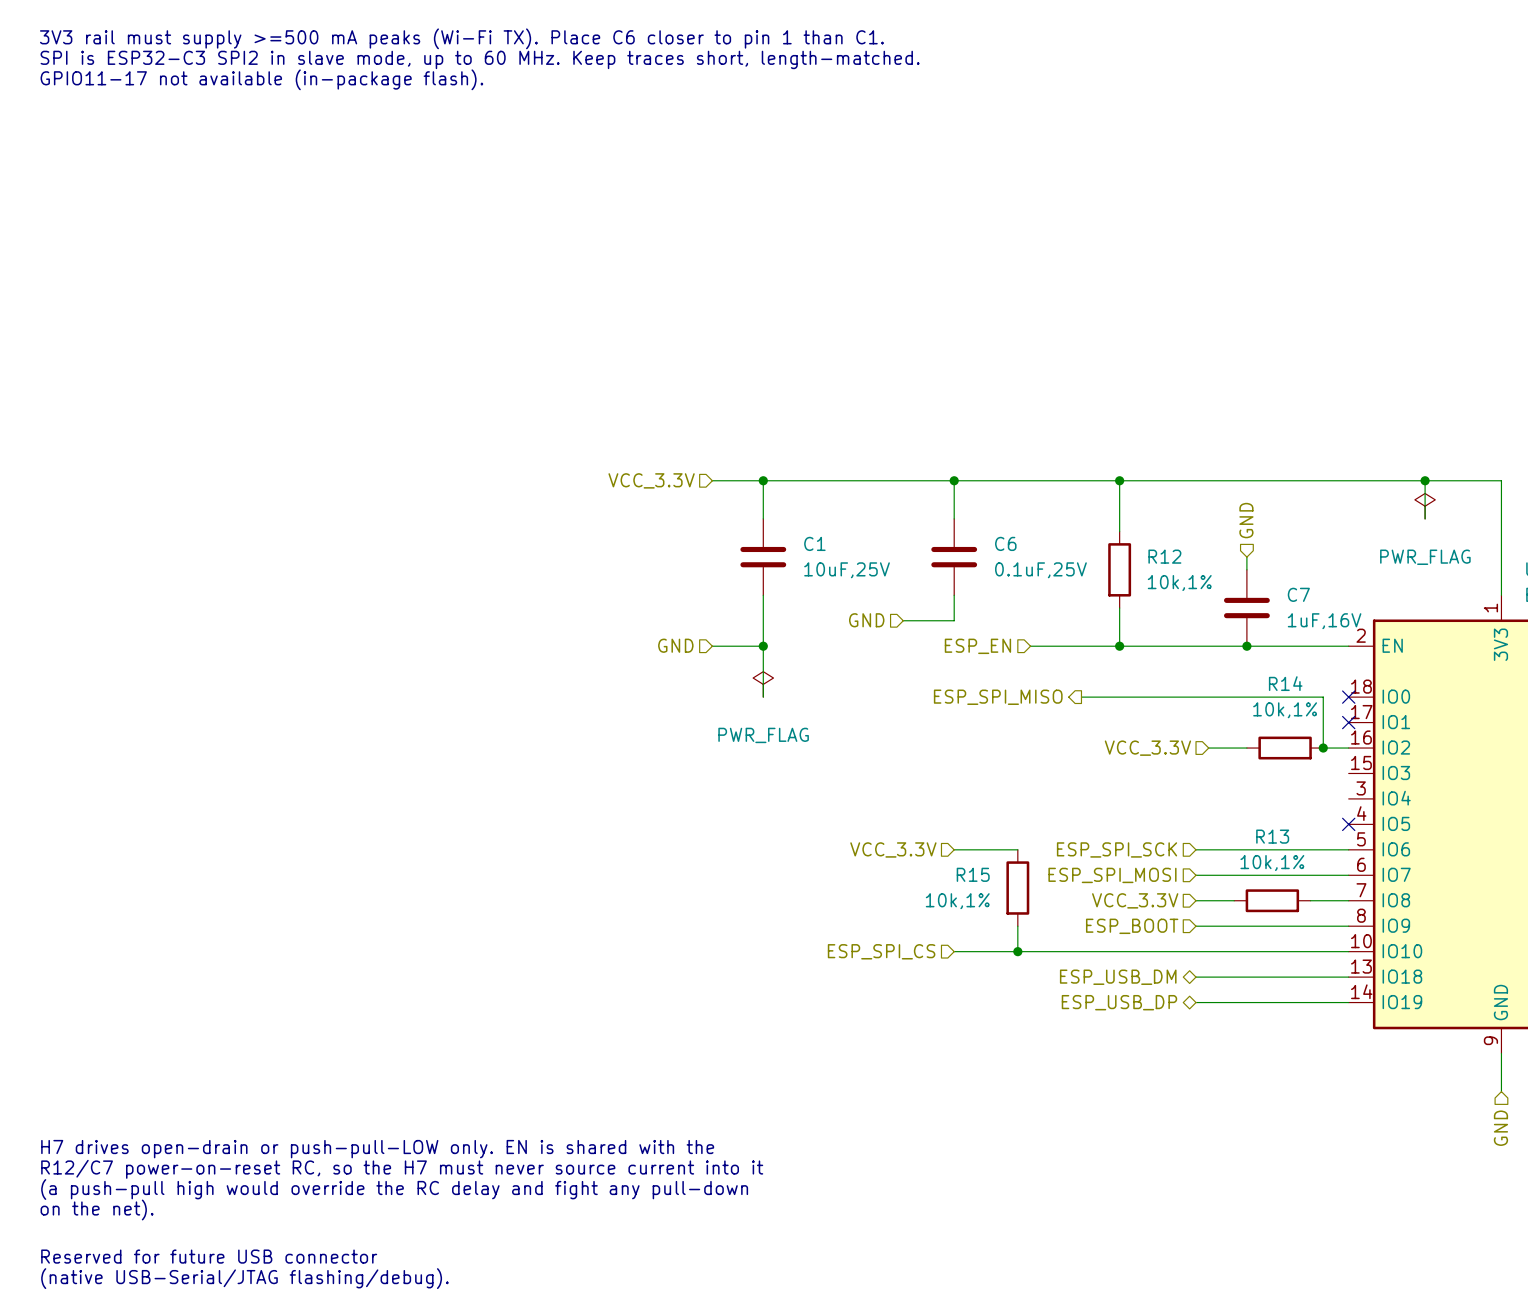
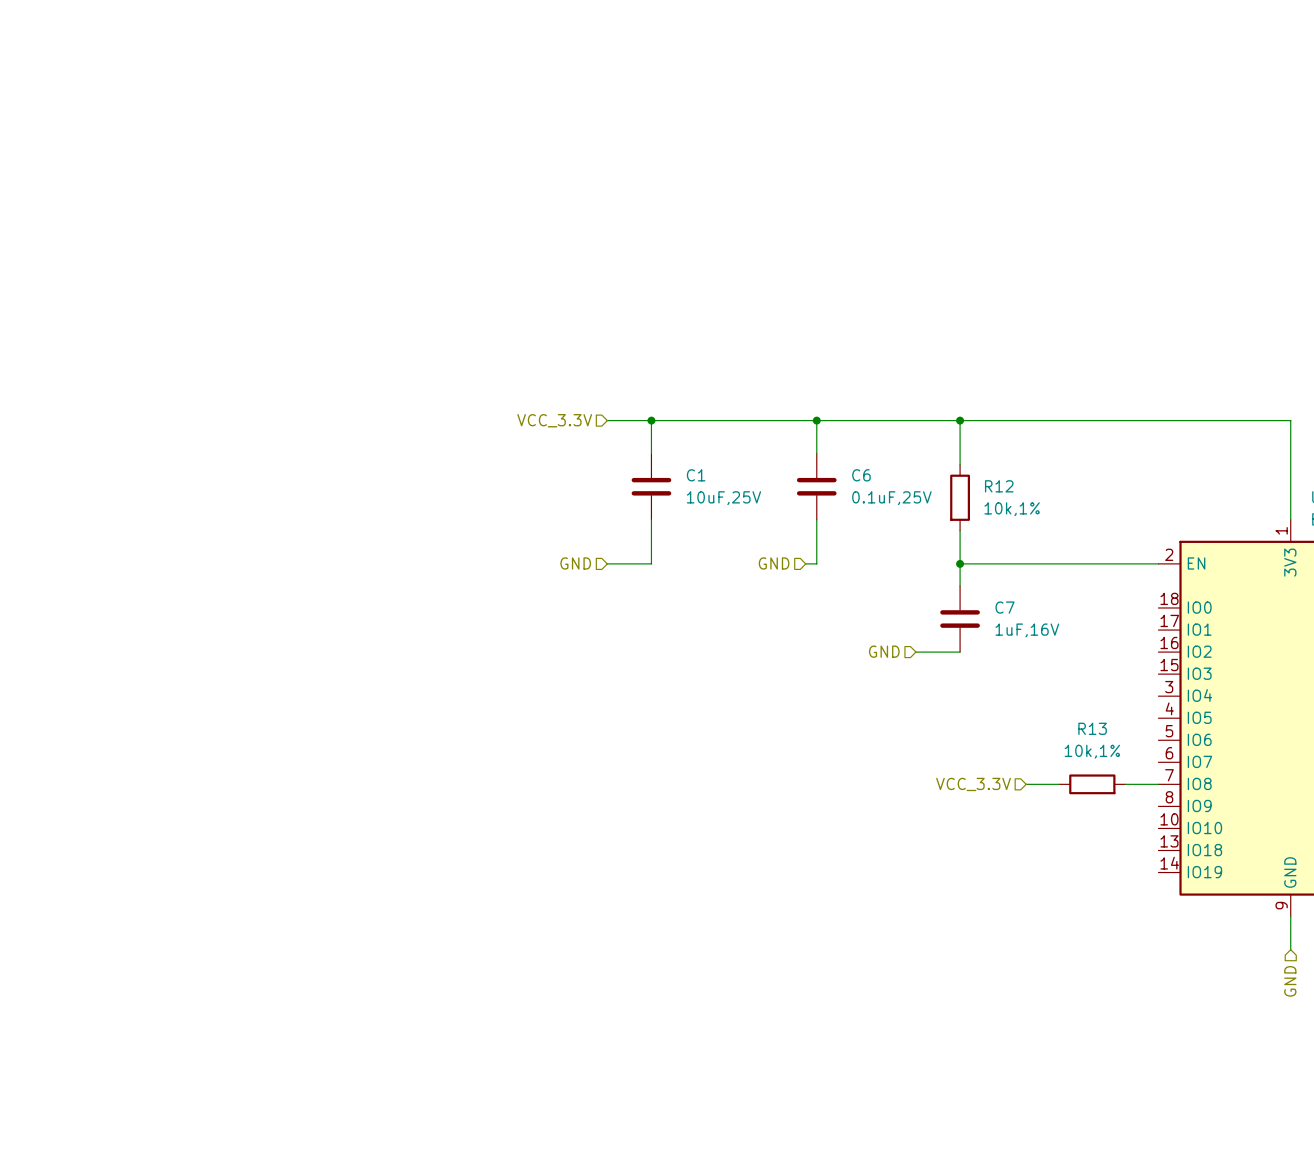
text: 3V3 rail must supply >=500 mA peaks (Wi-Fi TX). Place C6 closer to pin 1 than C1. (461, 38) -> none
text: SPI is ESP32-C3 SPI2 in slave mode, up to 60 MHz. Keep traces short, length-matched. (480, 59) -> none
text: GPIO11-17 not available (in-package flash). (261, 79) -> none
wire: (1425, 480) (1425, 518) -> none
junction: (1425, 480) -> none
power symbol: PWR_FLAG (1425, 506) -> none
hierarchical label: GND (1246, 520) -> none
wire: (1246, 557) (1246, 569) -> none
C7 position: (1246, 608) -> (960, 619)
hierarchical label position: GND (866, 620) -> GND (774, 563)
wire: (903, 620) (954, 620) -> (805, 563) (816, 563) (816, 541)
wire: (763, 646) (763, 697) -> none
junction: (763, 646) -> none
hierarchical label: ESP_EN (977, 646) -> none
wire: (1030, 646) (1119, 646) -> (960, 585) (960, 563)
junction: (1246, 646) -> none
power symbol: PWR_FLAG (763, 684) -> none
hierarchical label: ESP_SPI_MISO (998, 697) -> none
wire: (1081, 697) (1323, 697) (1323, 748) (1348, 748) -> none
no-connect mark: (1348, 697) -> none
no-connect mark: (1348, 722) -> none
hierarchical label: none -> GND (884, 651)
wire: none -> (915, 652) (960, 652)
hierarchical label: VCC_3.3V (1147, 748) -> none
wire: (1208, 748) (1246, 748) -> none
R14: 10k,1% (1285, 748) -> none
junction: (1323, 748) -> none
no-connect mark: (1348, 824) -> none
hierarchical label: VCC_3.3V (893, 849) -> none
wire: (954, 849) (1017, 849) -> none
hierarchical label: ESP_SPI_SCK (1117, 849) -> none
wire: (1196, 849) (1348, 849) -> none
hierarchical label: ESP_SPI_MOSI (1112, 875) -> none
wire: (1196, 875) (1348, 875) -> none
R15: 10k,1% (1017, 888) -> none
wire: (1017, 926) (1017, 951) -> none
hierarchical label: ESP_BOOT (1132, 926) -> none
wire: (1196, 926) (1348, 926) -> none
hierarchical label: ESP_SPI_CS (881, 951) -> none
wire: (954, 951) (1348, 951) -> none
junction: (1017, 951) -> none
hierarchical label: ESP_USB_DM (1118, 977) -> none
wire: (1196, 977) (1348, 977) -> none
hierarchical label: ESP_USB_DP (1119, 1002) -> none
wire: (1196, 1002) (1348, 1002) -> none
text: H7 drives open-drain or push-pull-LOW only. EN is shared with the (377, 1149) -> none
text: R12/C7 power-on-reset RC, so the H7 must never source current into it (402, 1169) -> none
text: (a push-pull high would override the RC delay and fight any pull-down (394, 1189) -> none
text: on the net). (97, 1209) -> none
text: Reserved for future USB connector (209, 1256) -> none
text: (native USB-Serial/JTAG flashing/debug). (244, 1278) -> none

